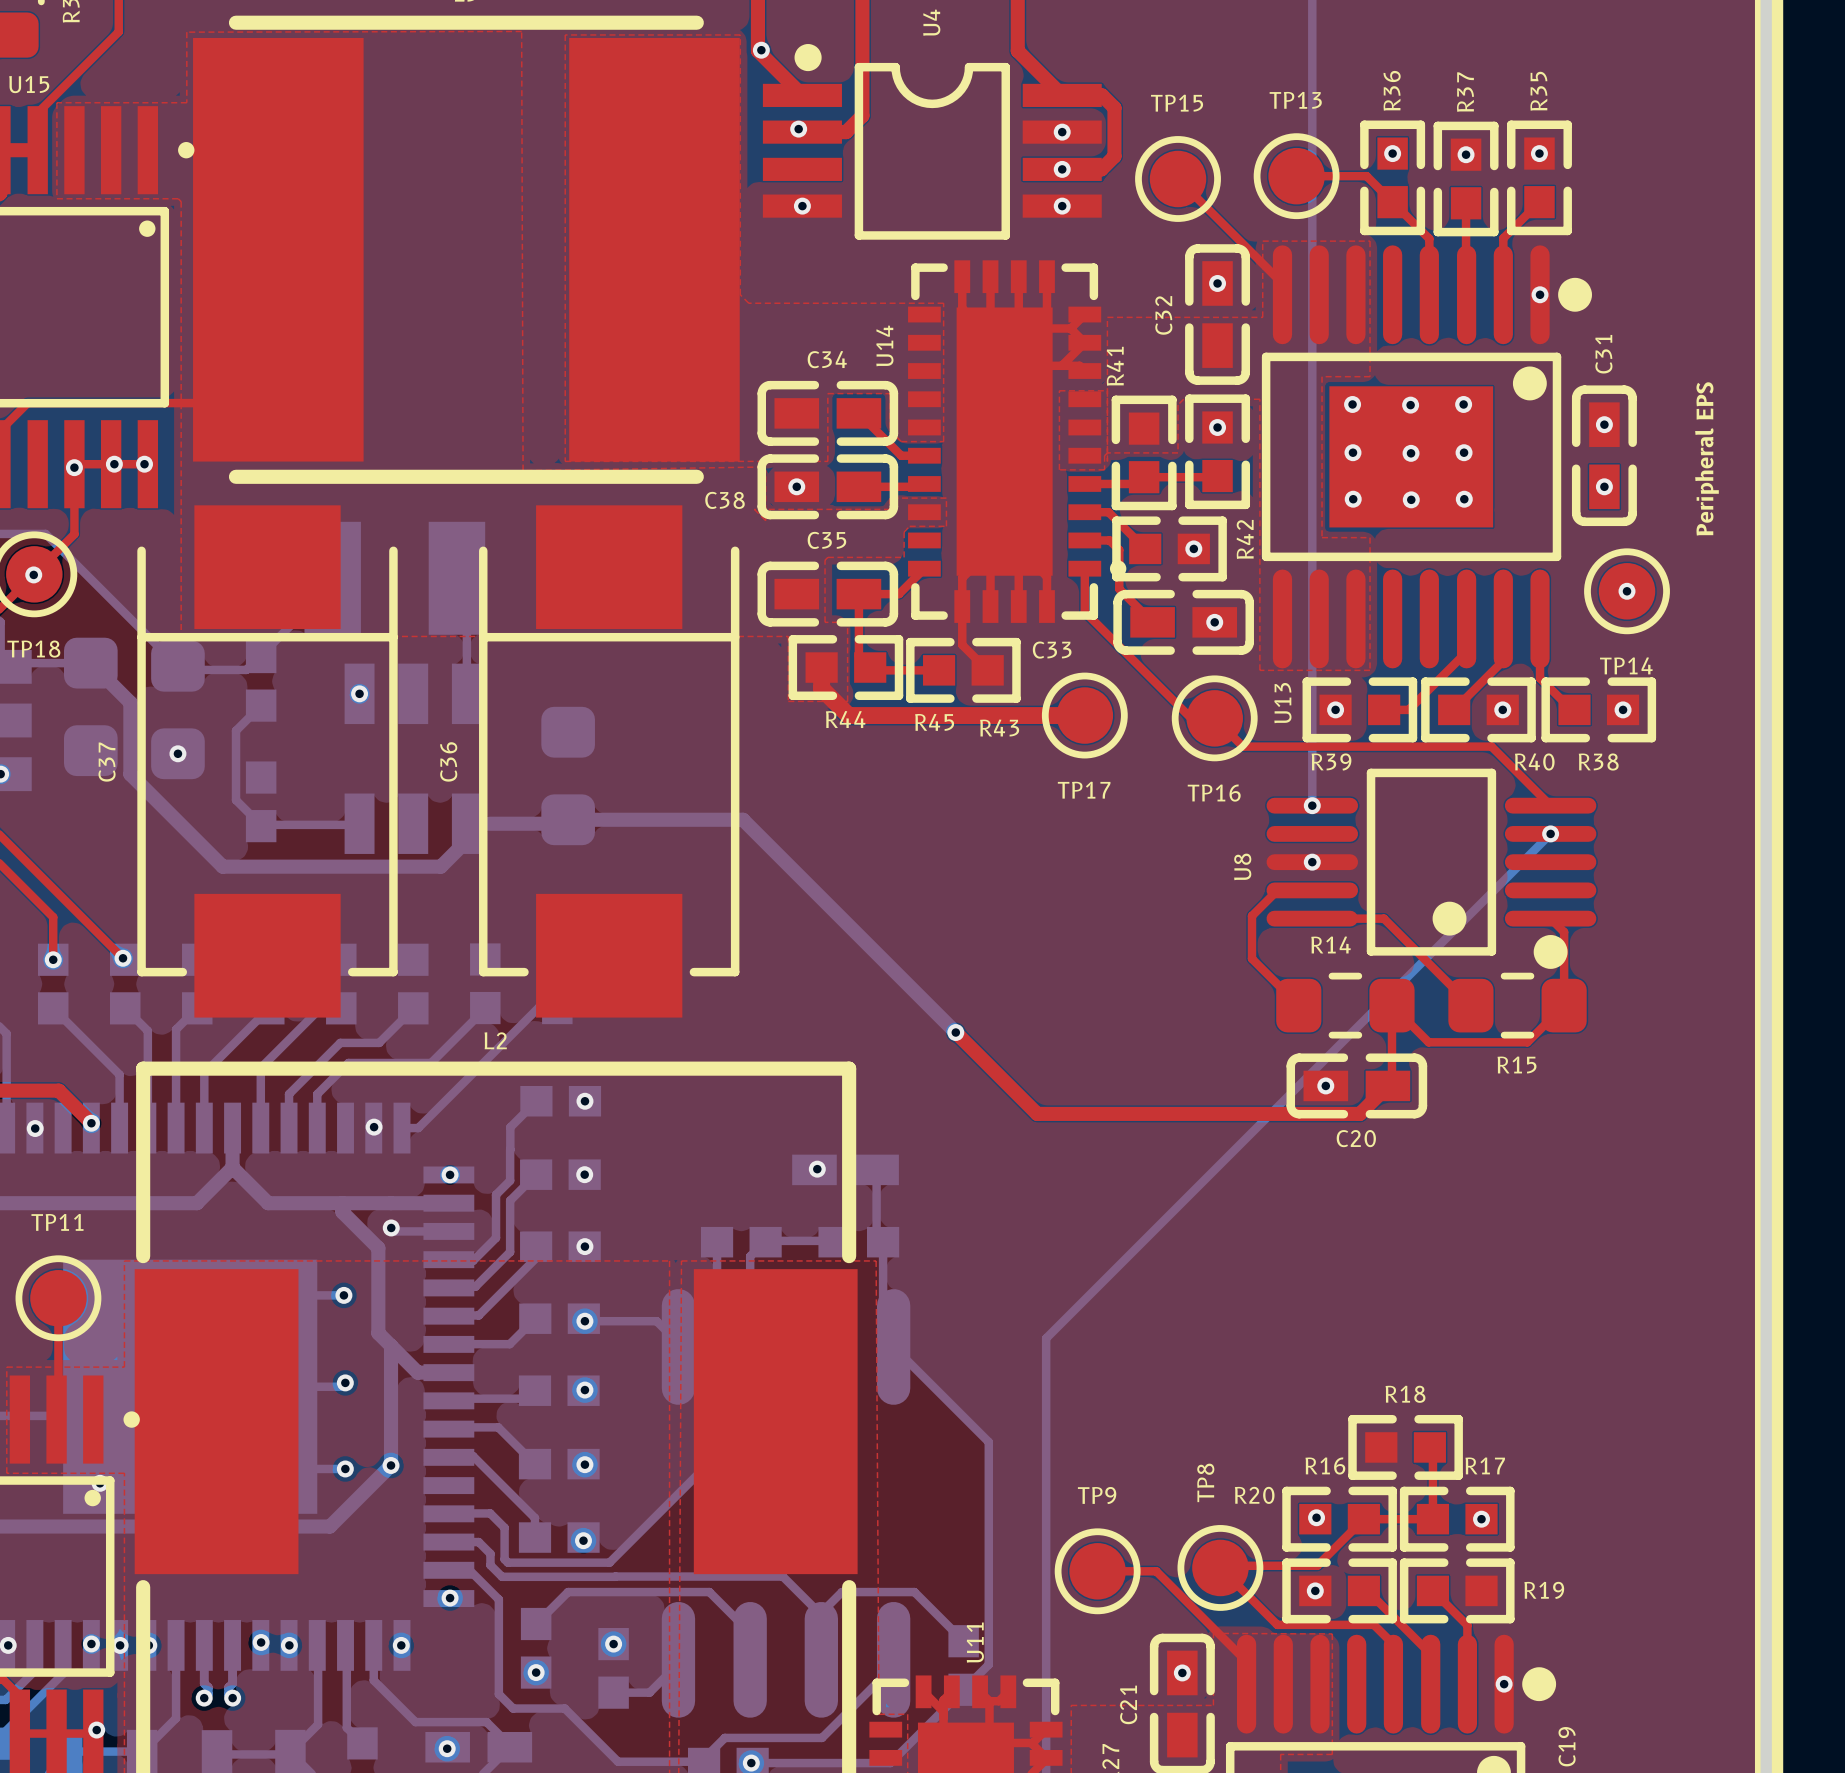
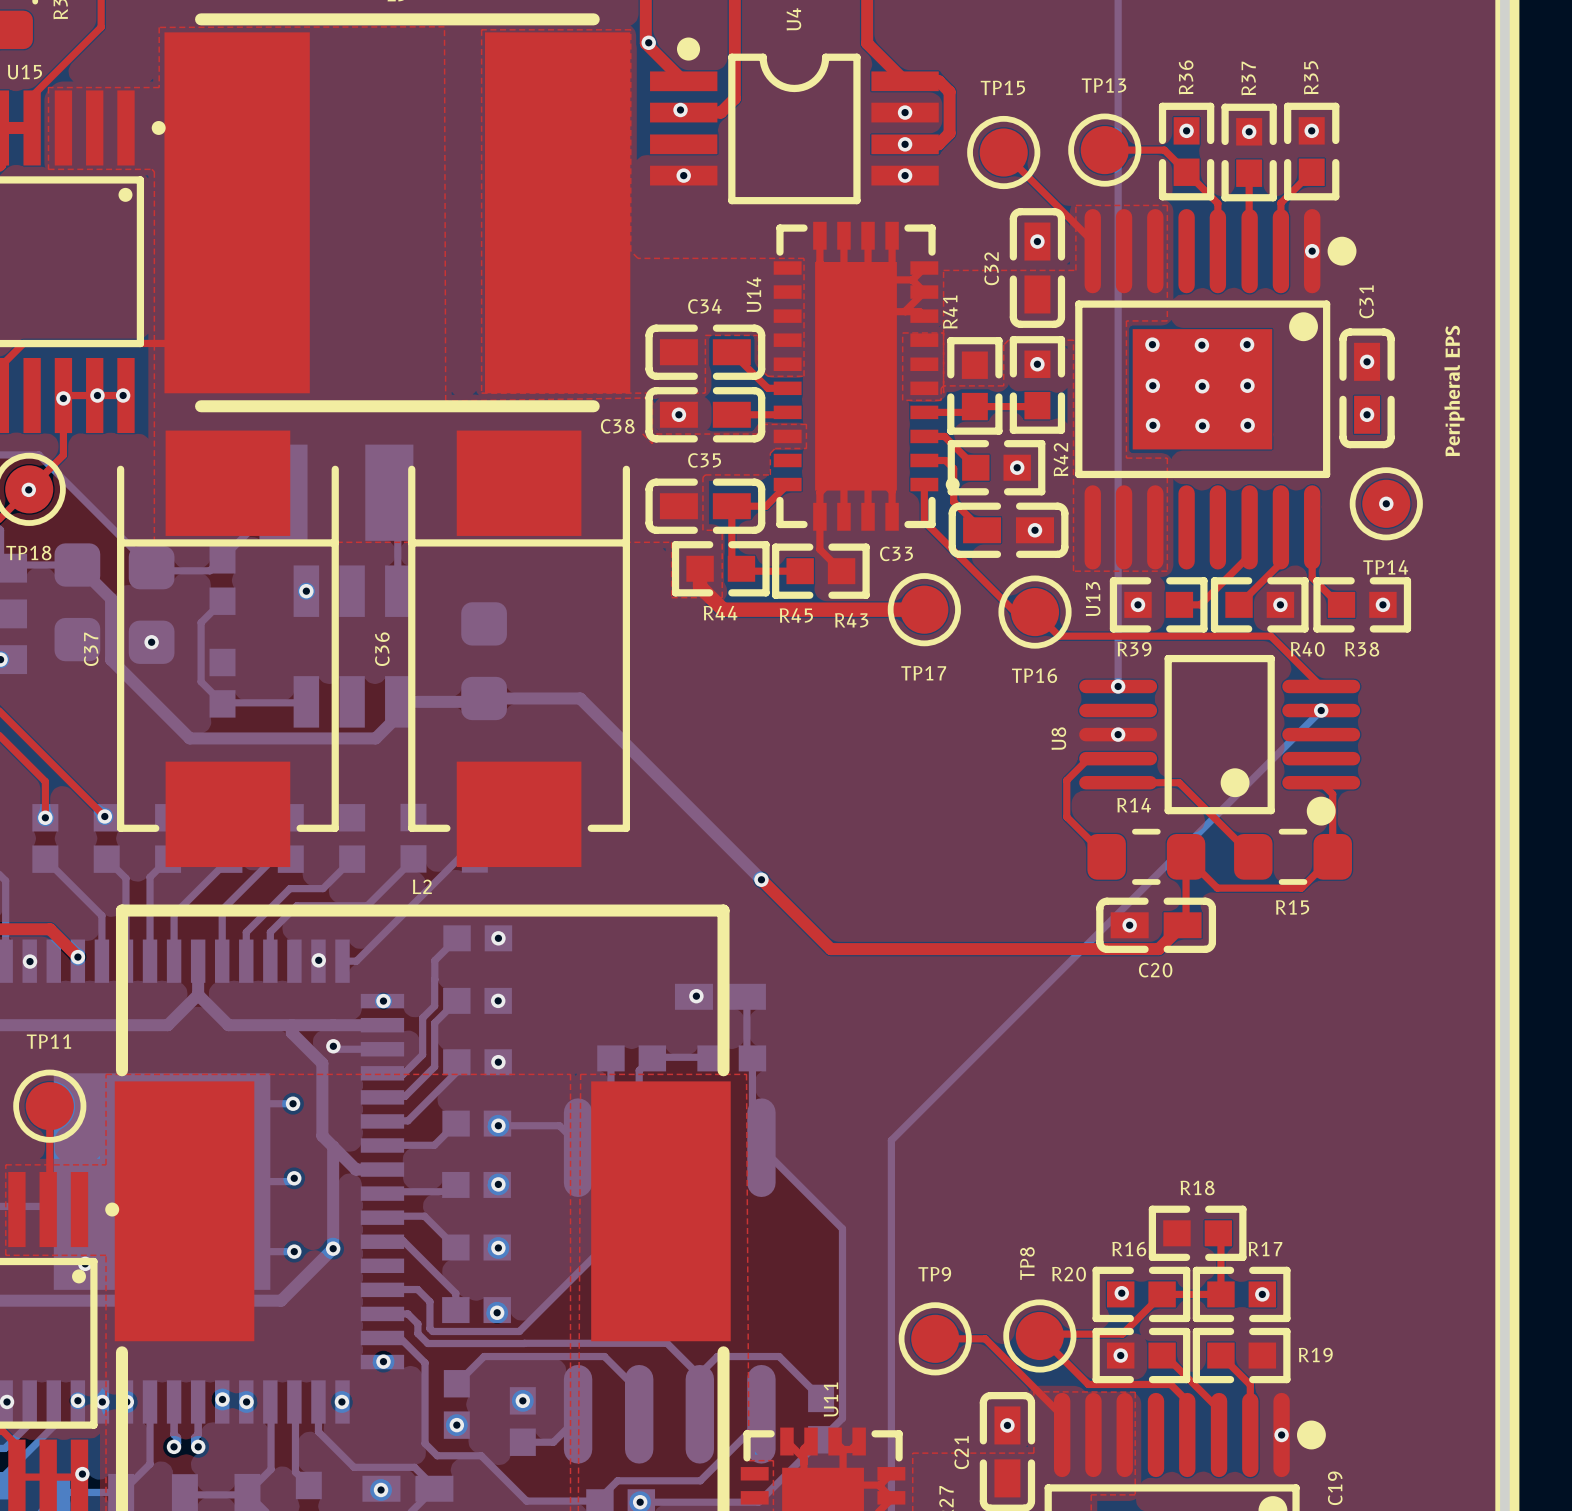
bottom track: (680, 819) (743, 819) (955, 1032) -> (580, 698) (761, 879)
top track: (955, 1032) (1037, 1113) -> (761, 879) (830, 949) (883, 949)
via position: (955, 1032) -> (761, 879)

